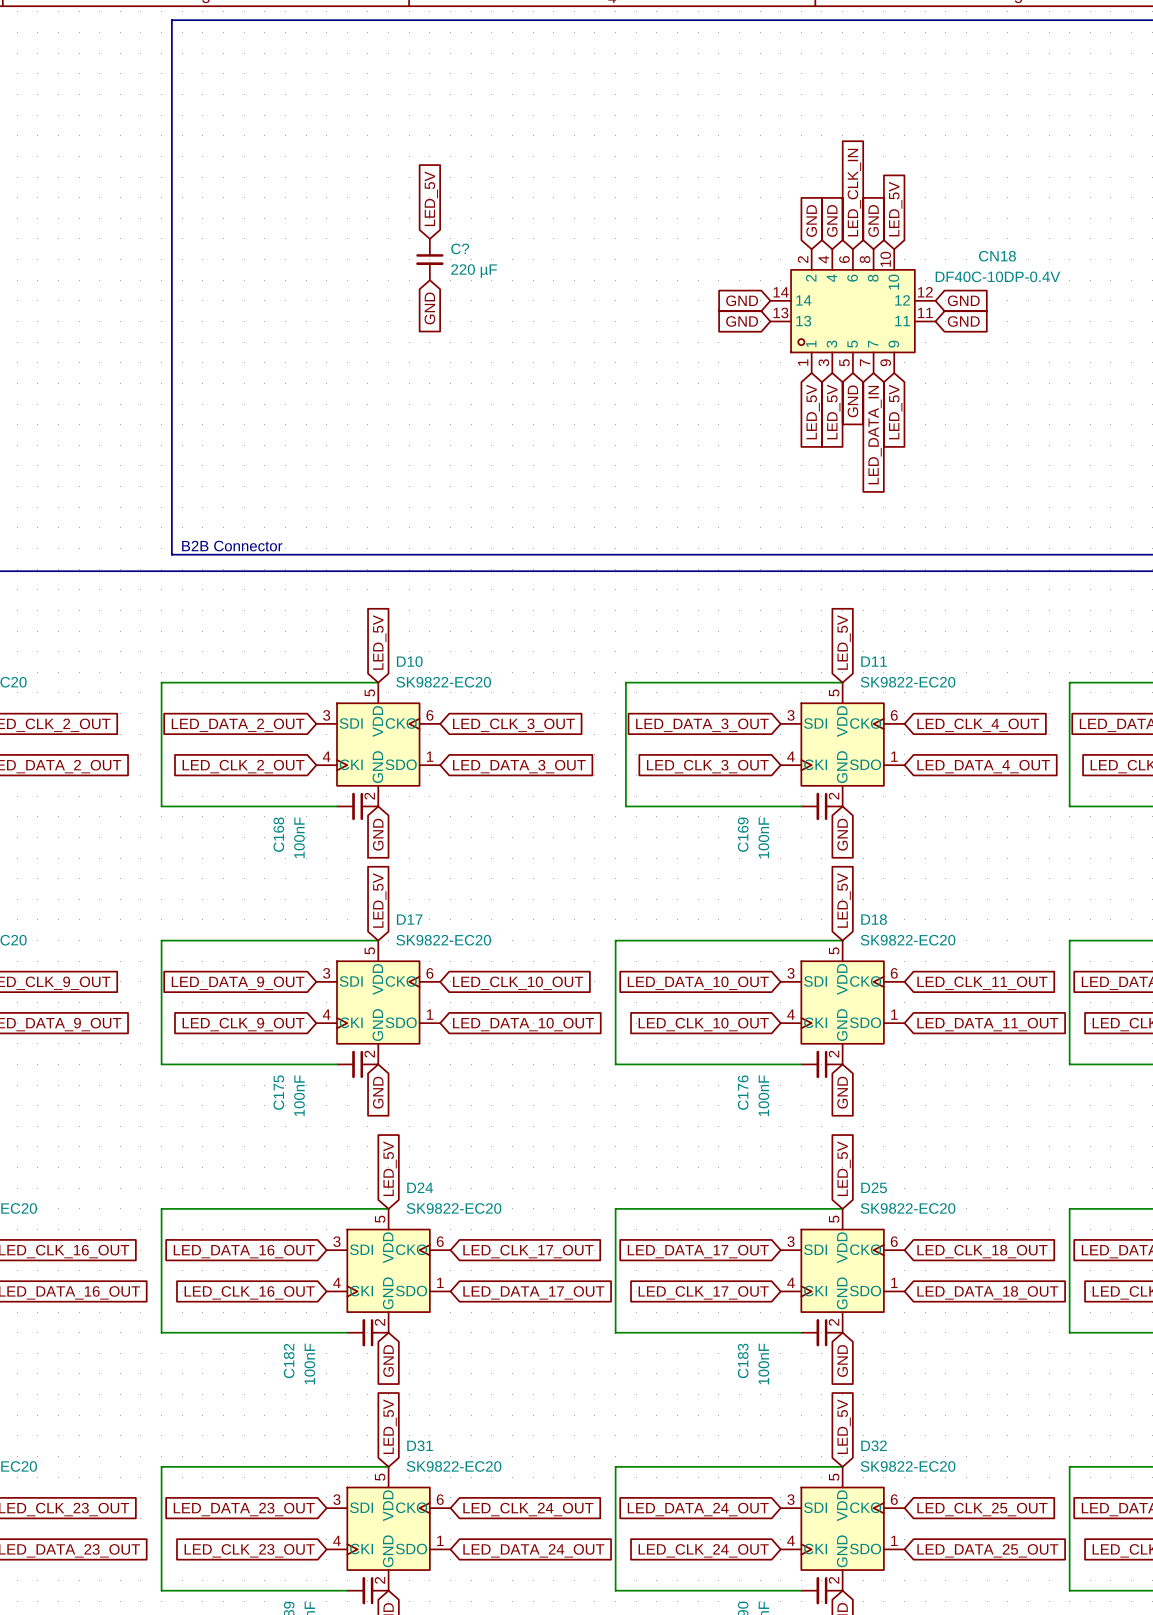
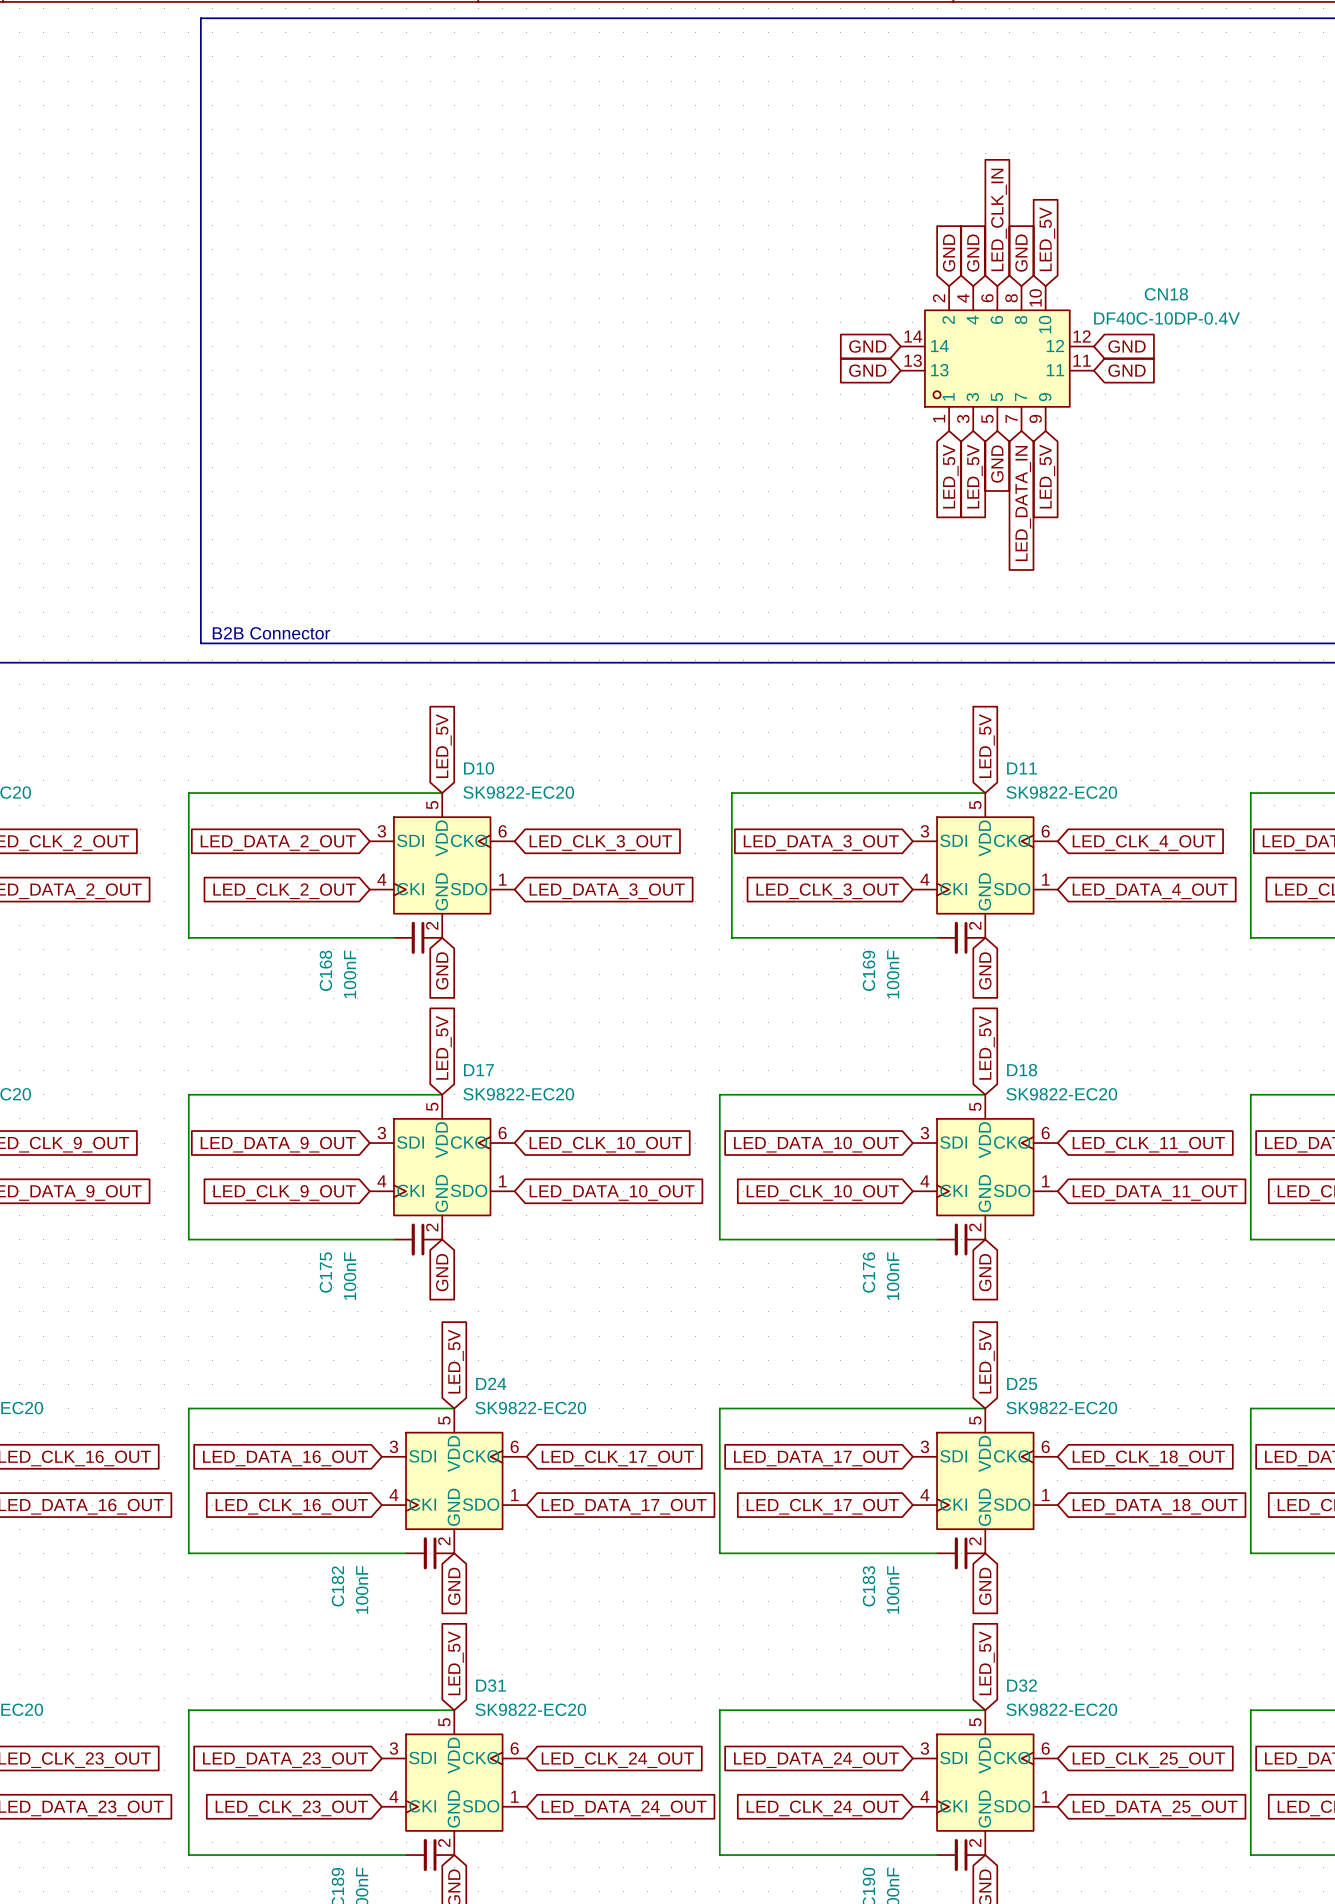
global label: LED_5V (431, 198) -> none
C?: 220 µF (429, 259) -> none
global label: GND (429, 308) -> none

